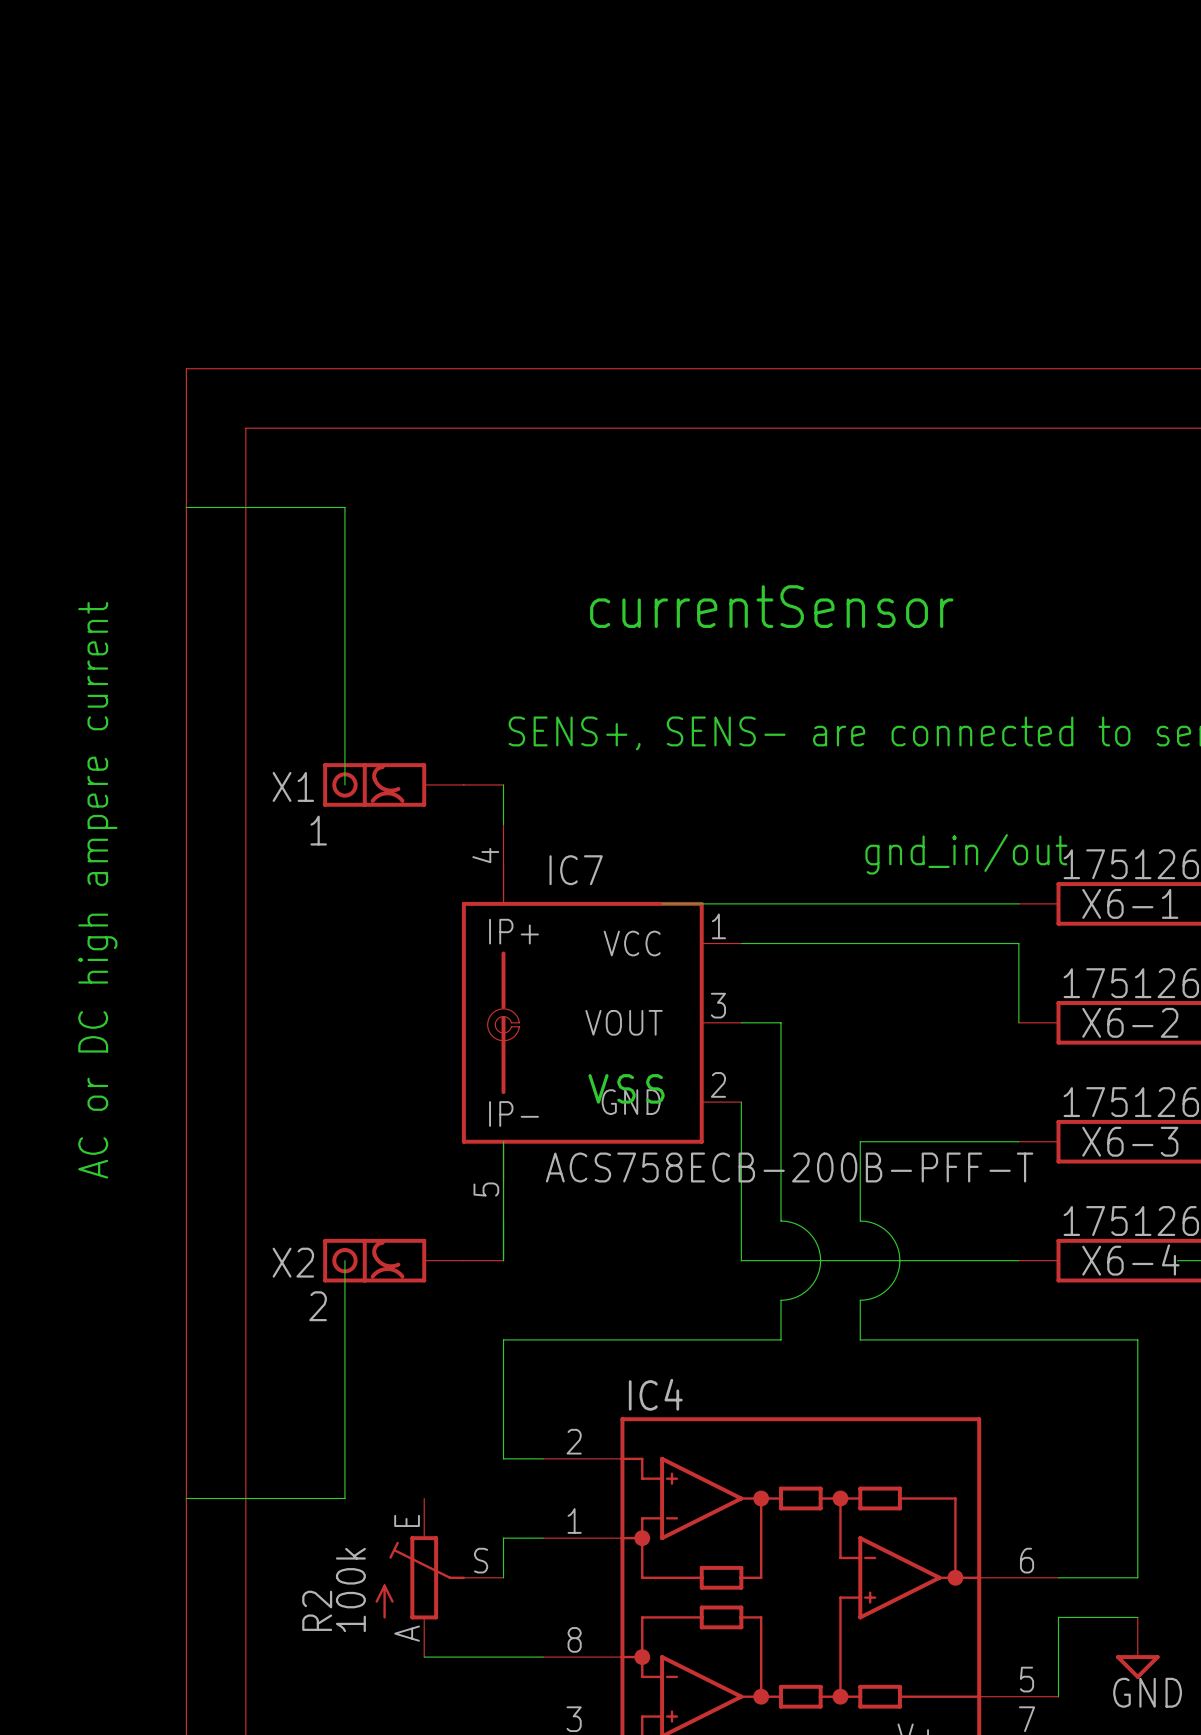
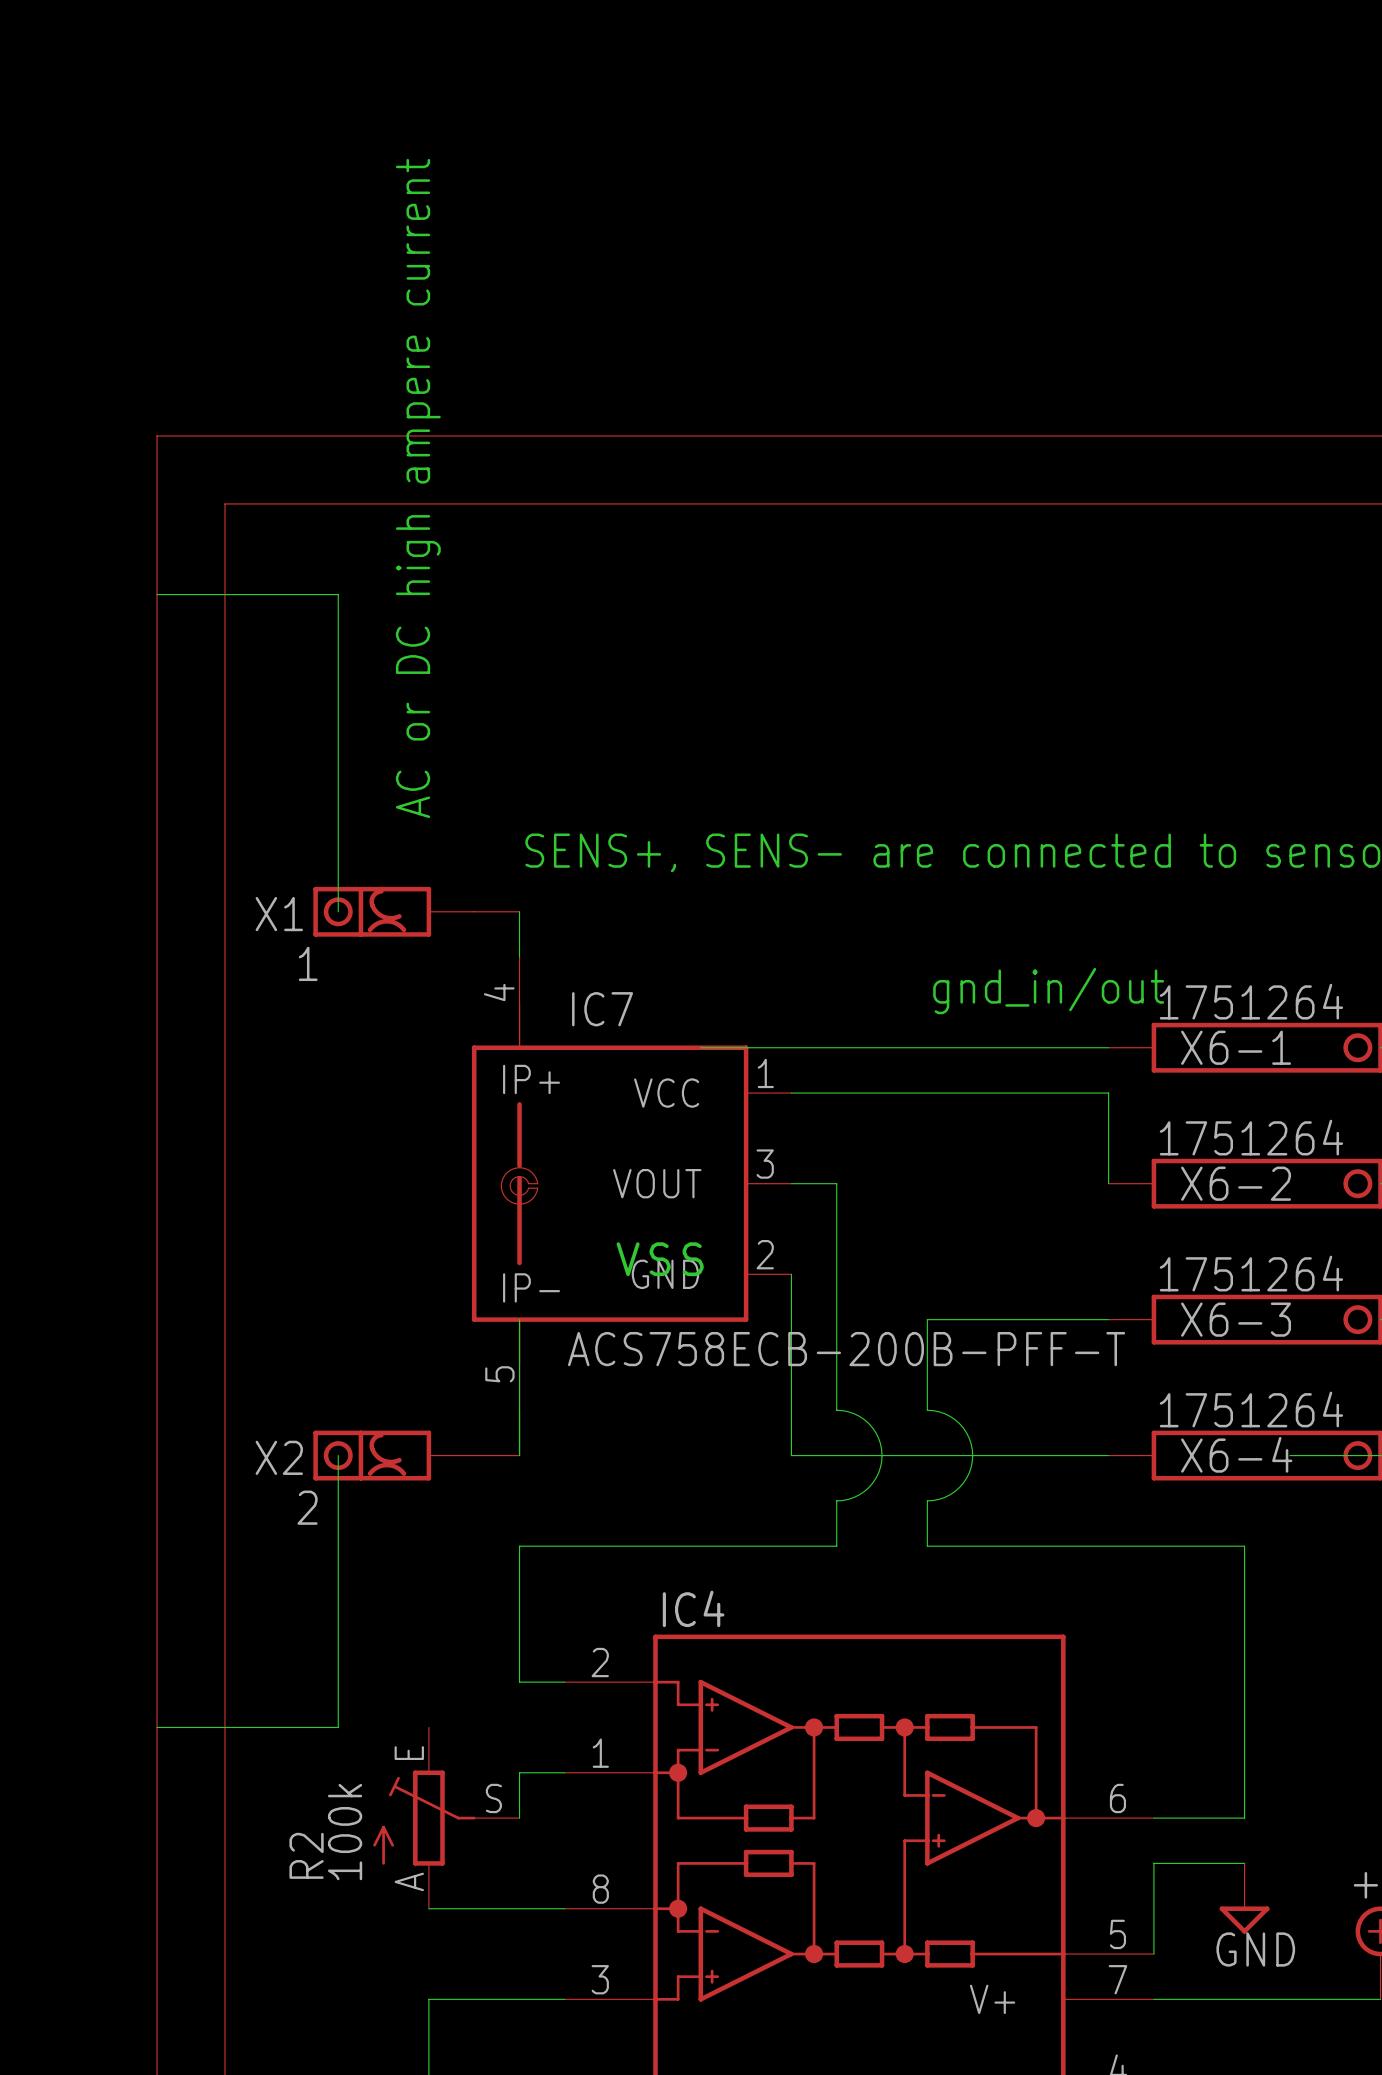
text: none -> AC or DC high ampere current (418, 488)
text: currentSensor (771, 606) -> none
text: AC or DC high ampere current (97, 890) -> none

